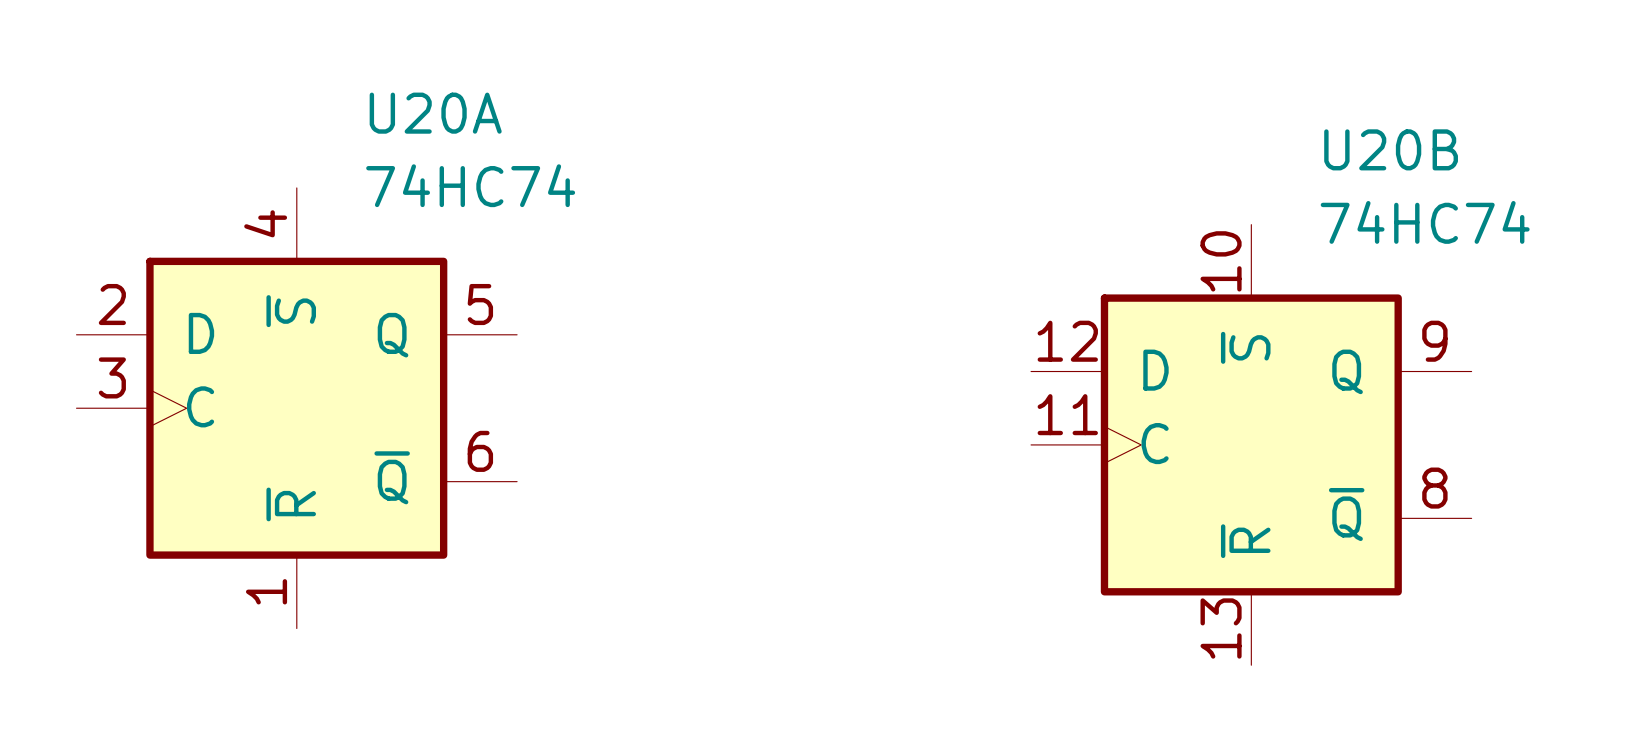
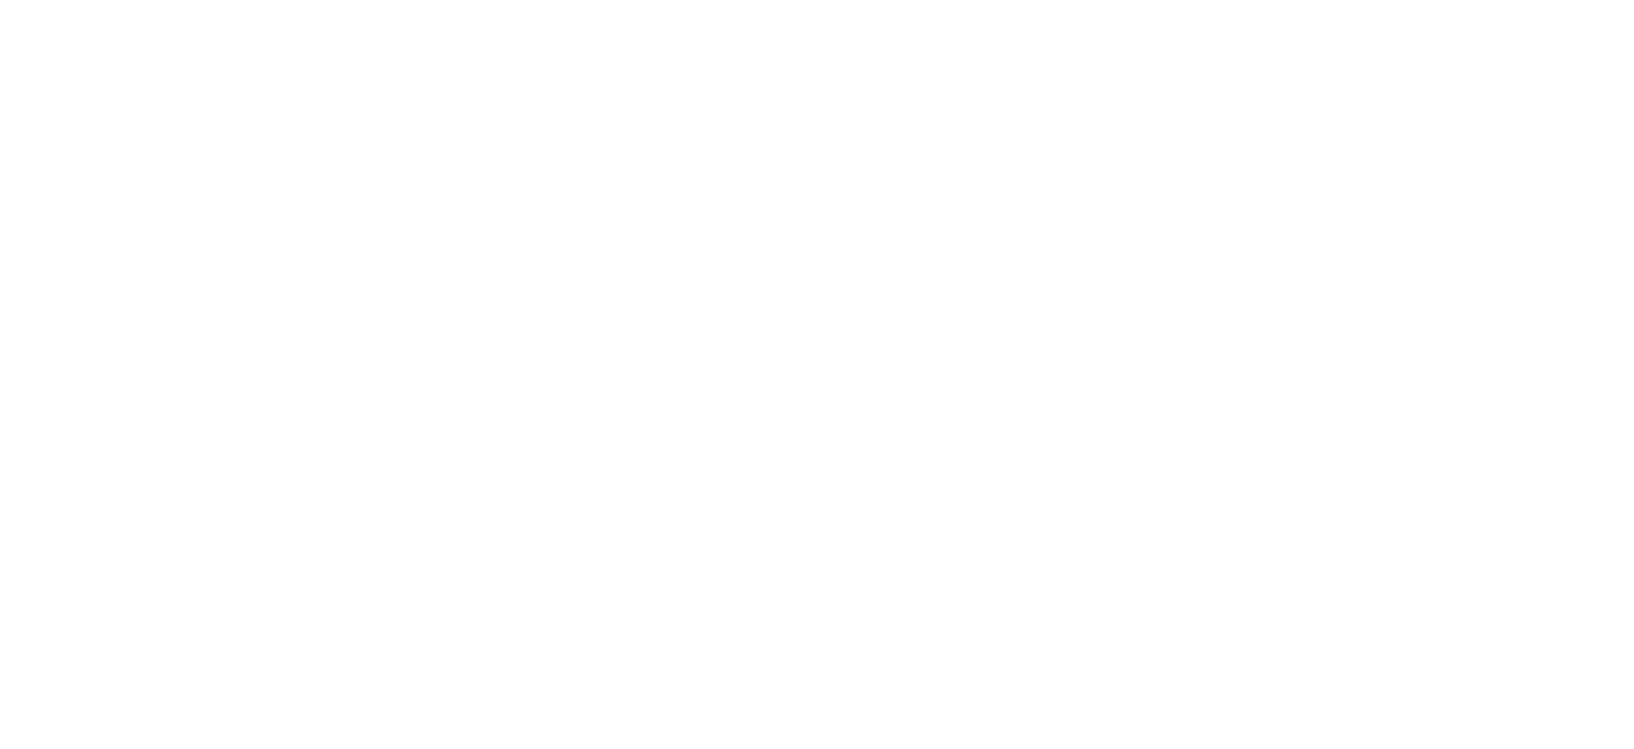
U20A: 74HC74 (296, 408) -> none
U20B: 74HC74 (1251, 444) -> none

